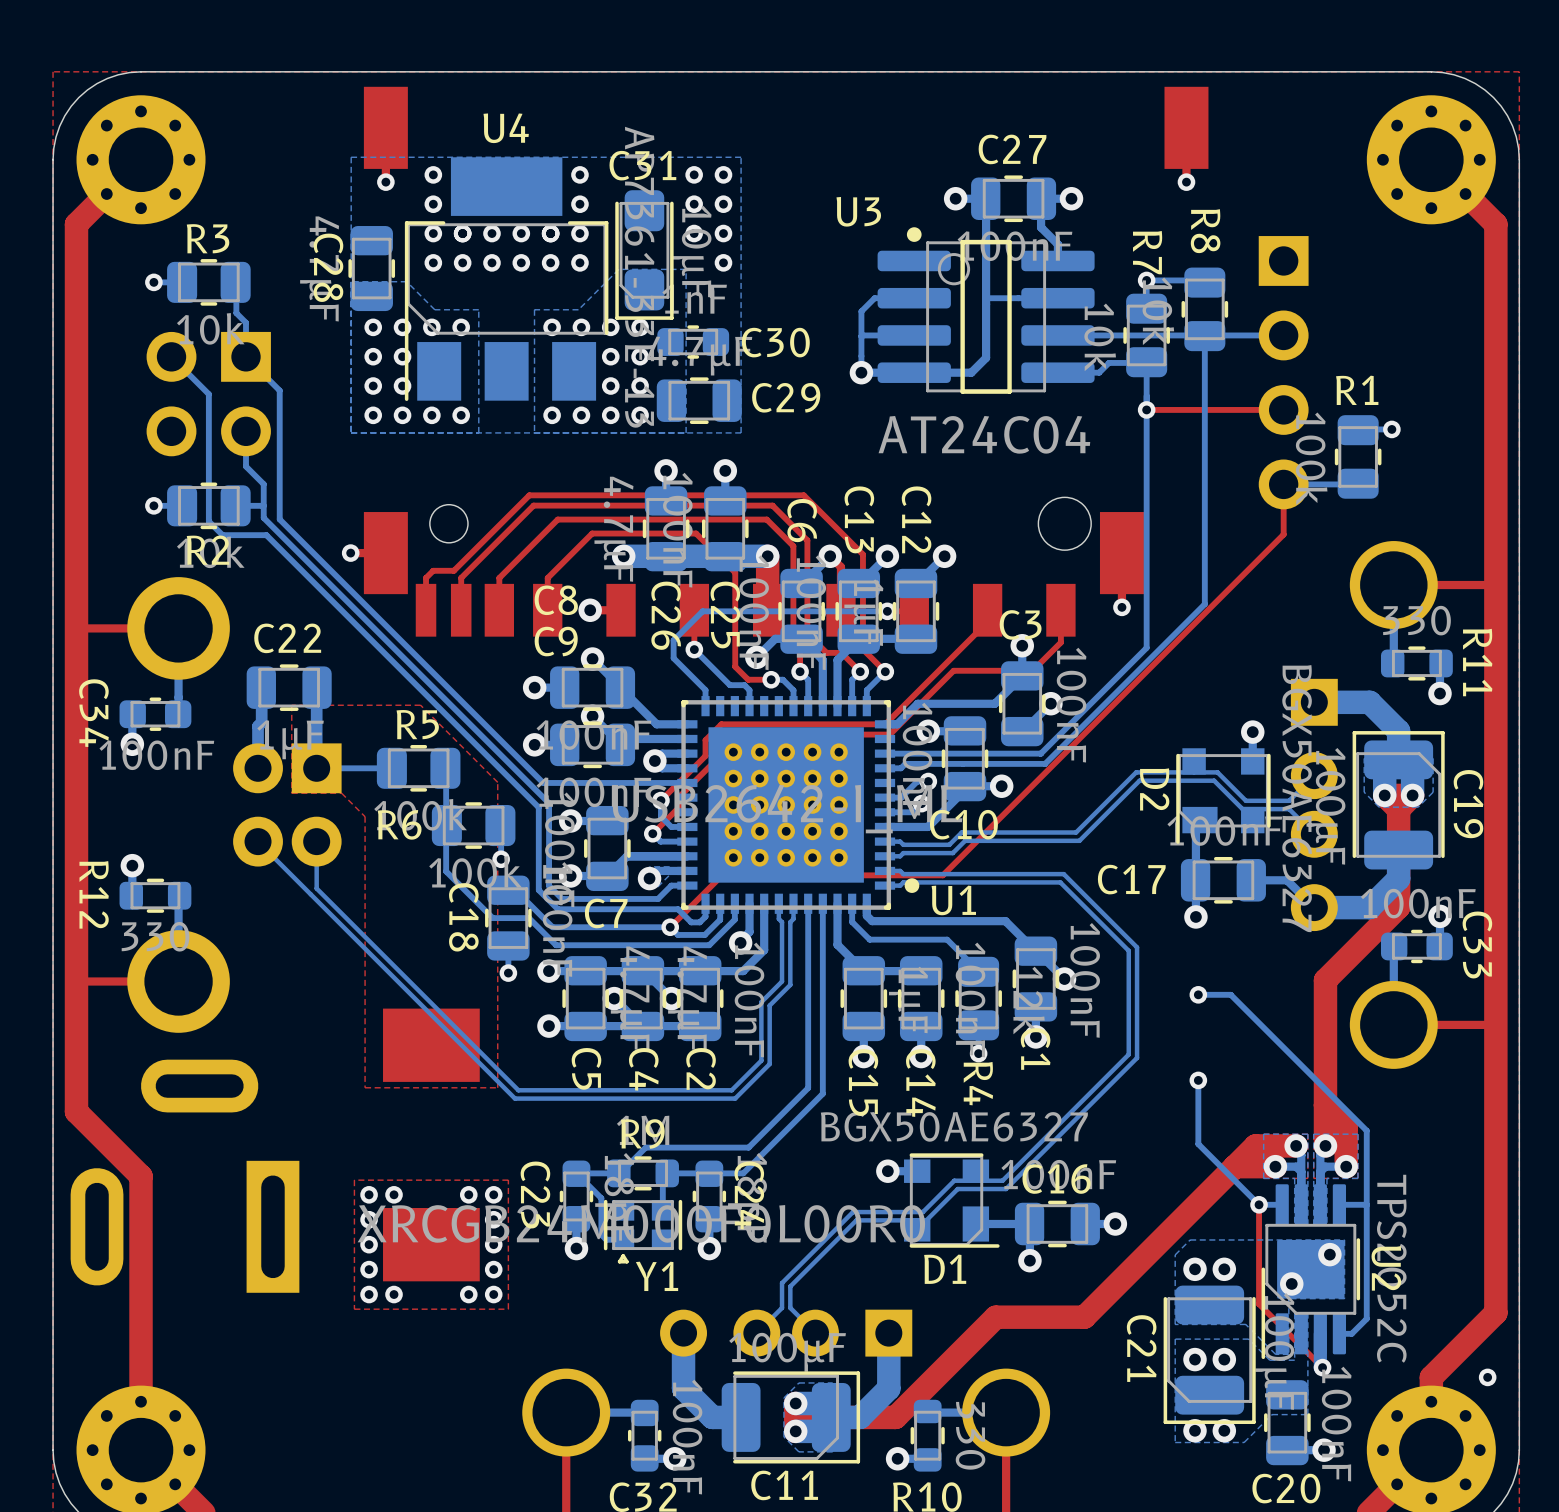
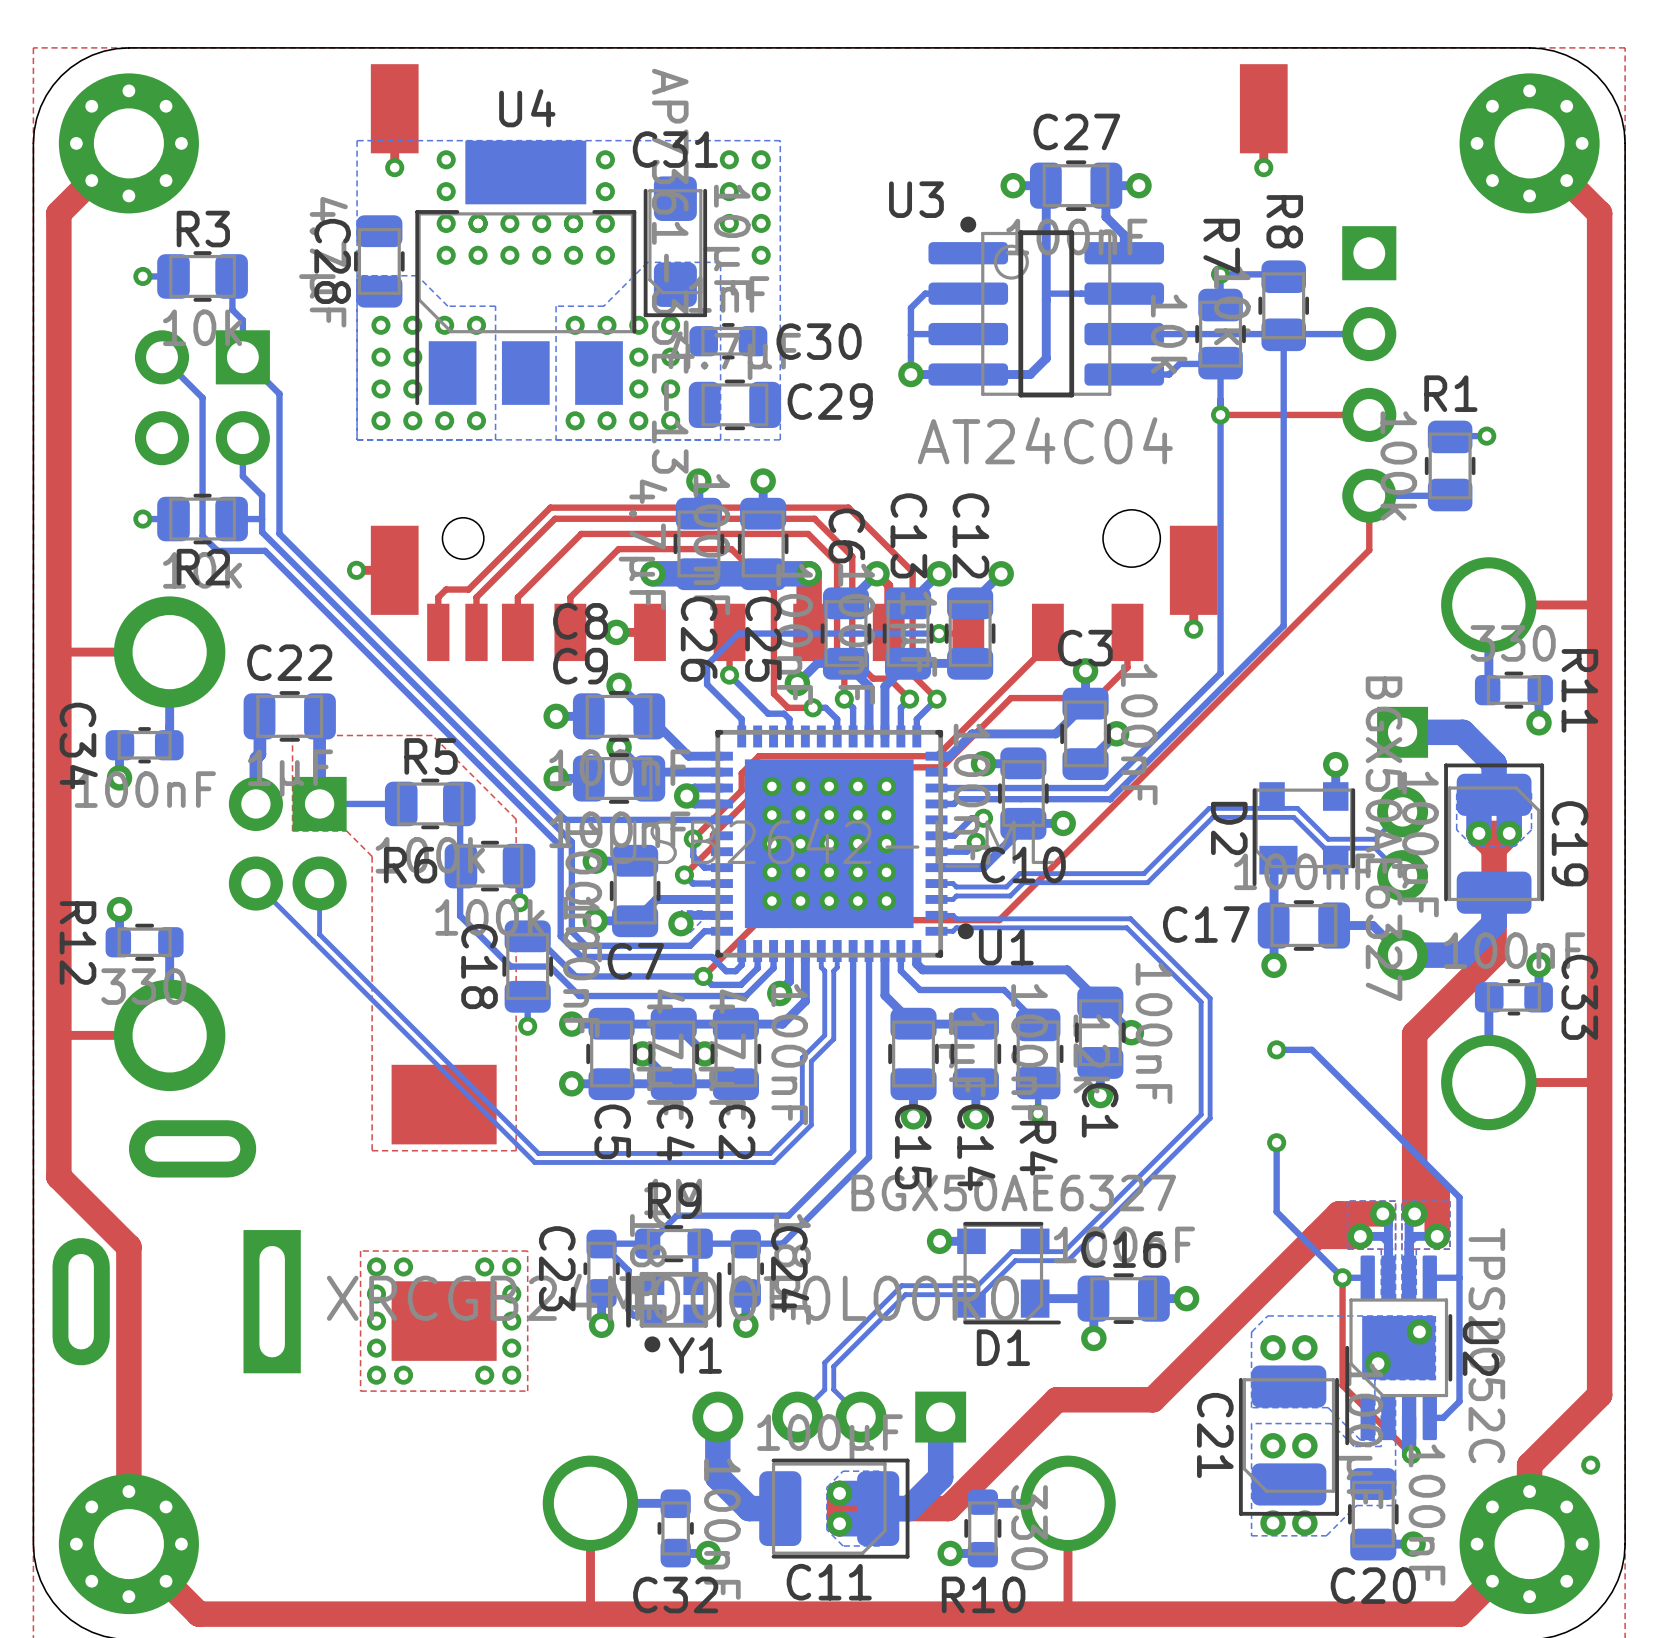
Y1 footprint: [603, 1199, 683, 1264] -> [626, 1271, 722, 1353]

